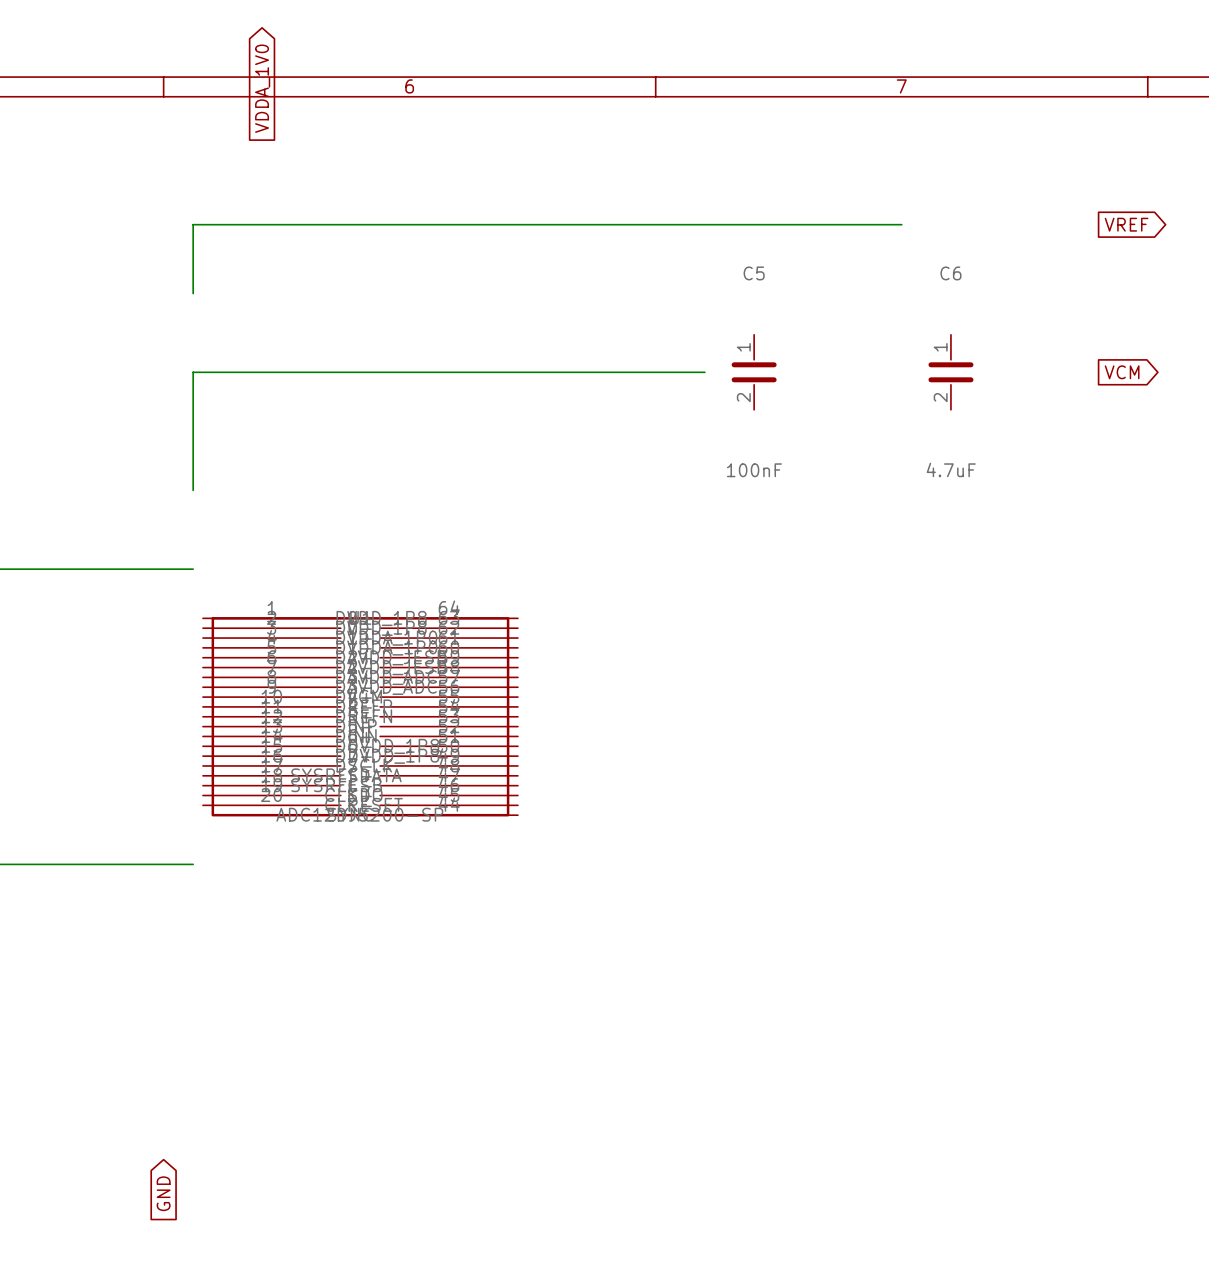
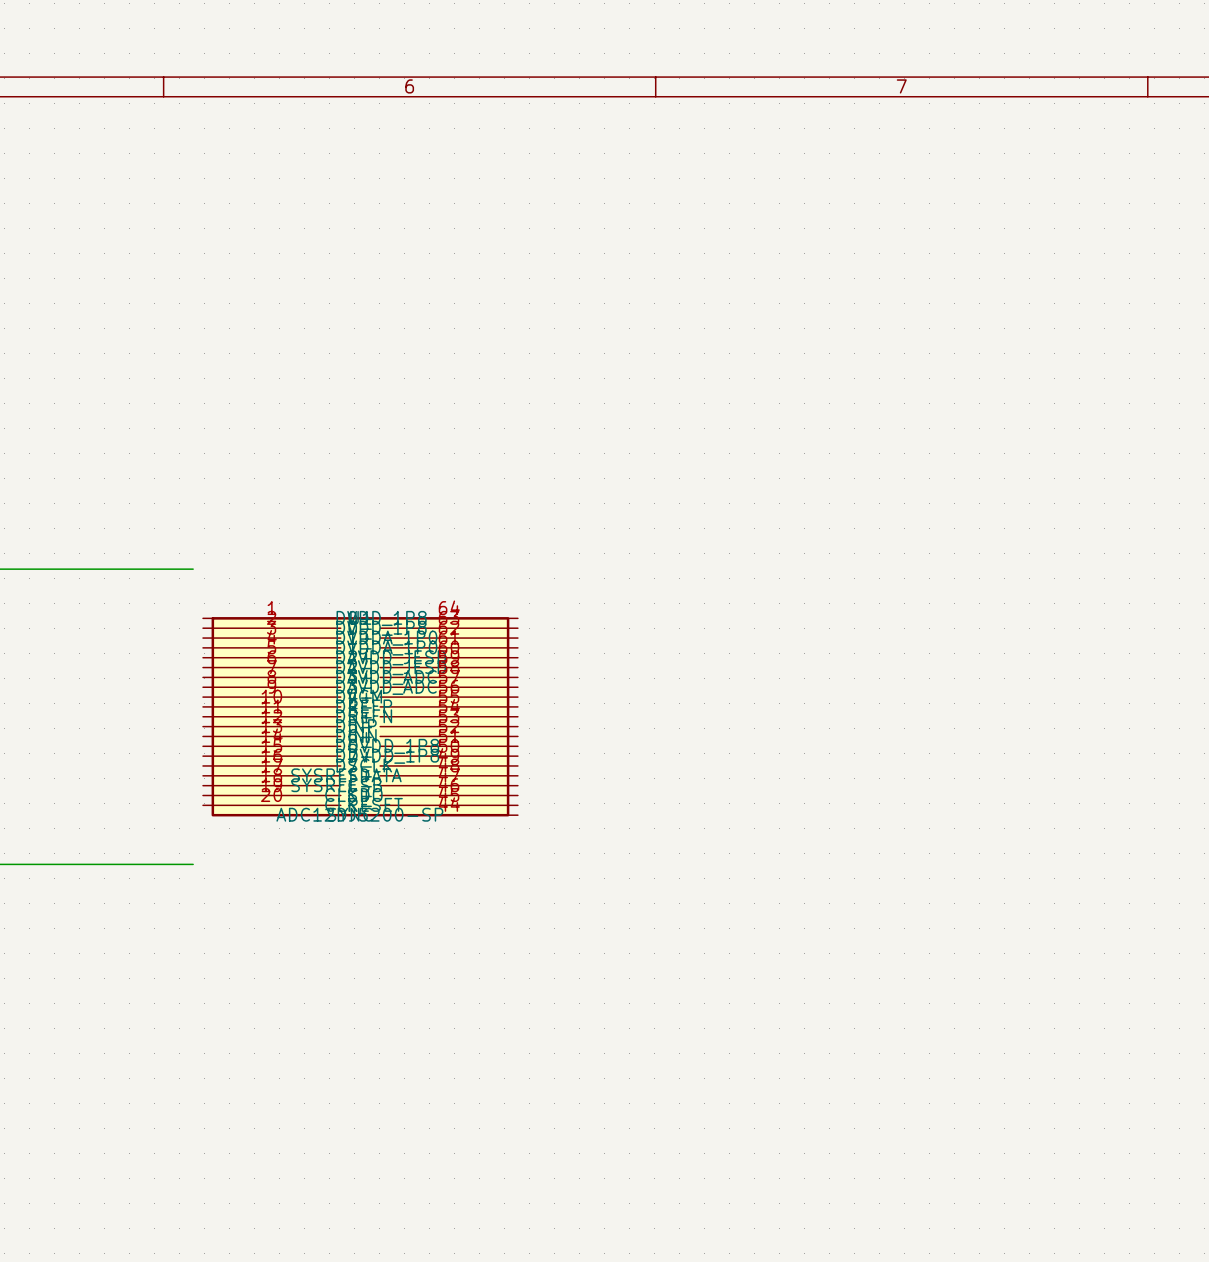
global label: VDDA_1V0 (262, 88) -> none
wire: (901, 224) (193, 224) (193, 293) -> none
global label: VREF (1126, 224) -> none
wire: (704, 372) (193, 372) (193, 490) -> none
C5: 100nF (754, 372) -> none
C6: 4.7uF (950, 372) -> none
global label: VCM (1122, 372) -> none
global label: GND (163, 1193) -> none

